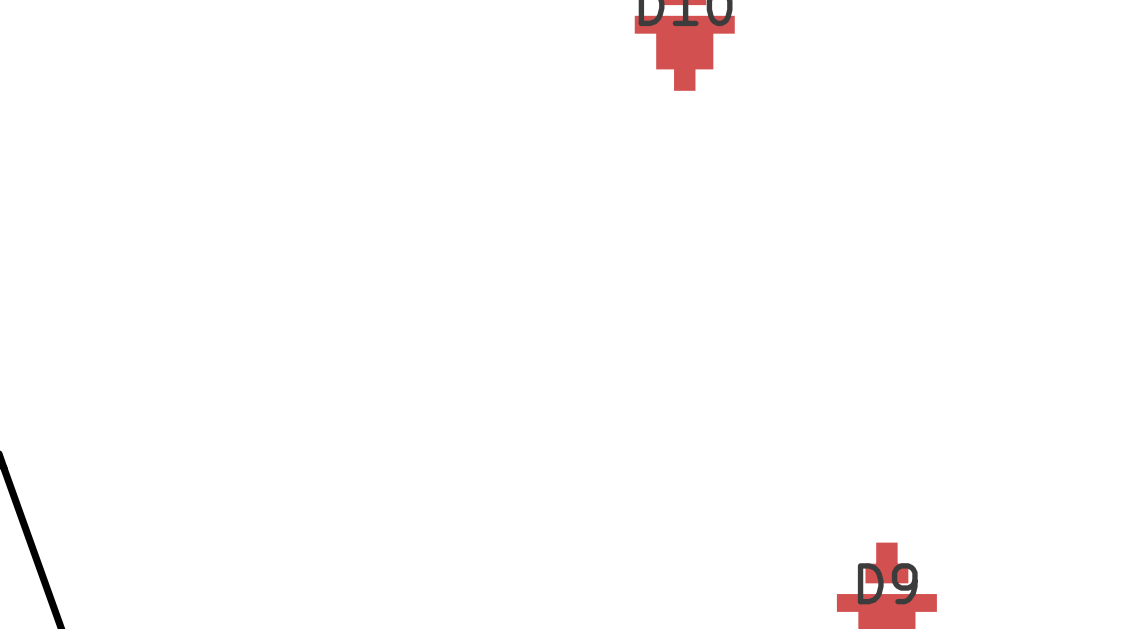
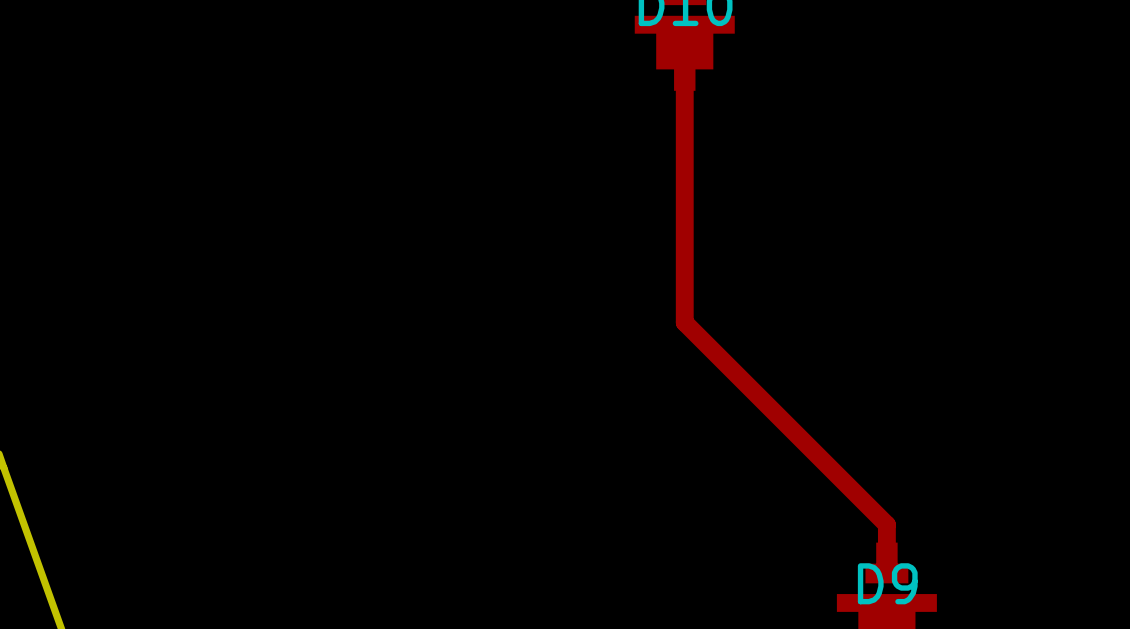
top track: none -> (684, 80) (684, 322) (886, 524) (886, 553)

